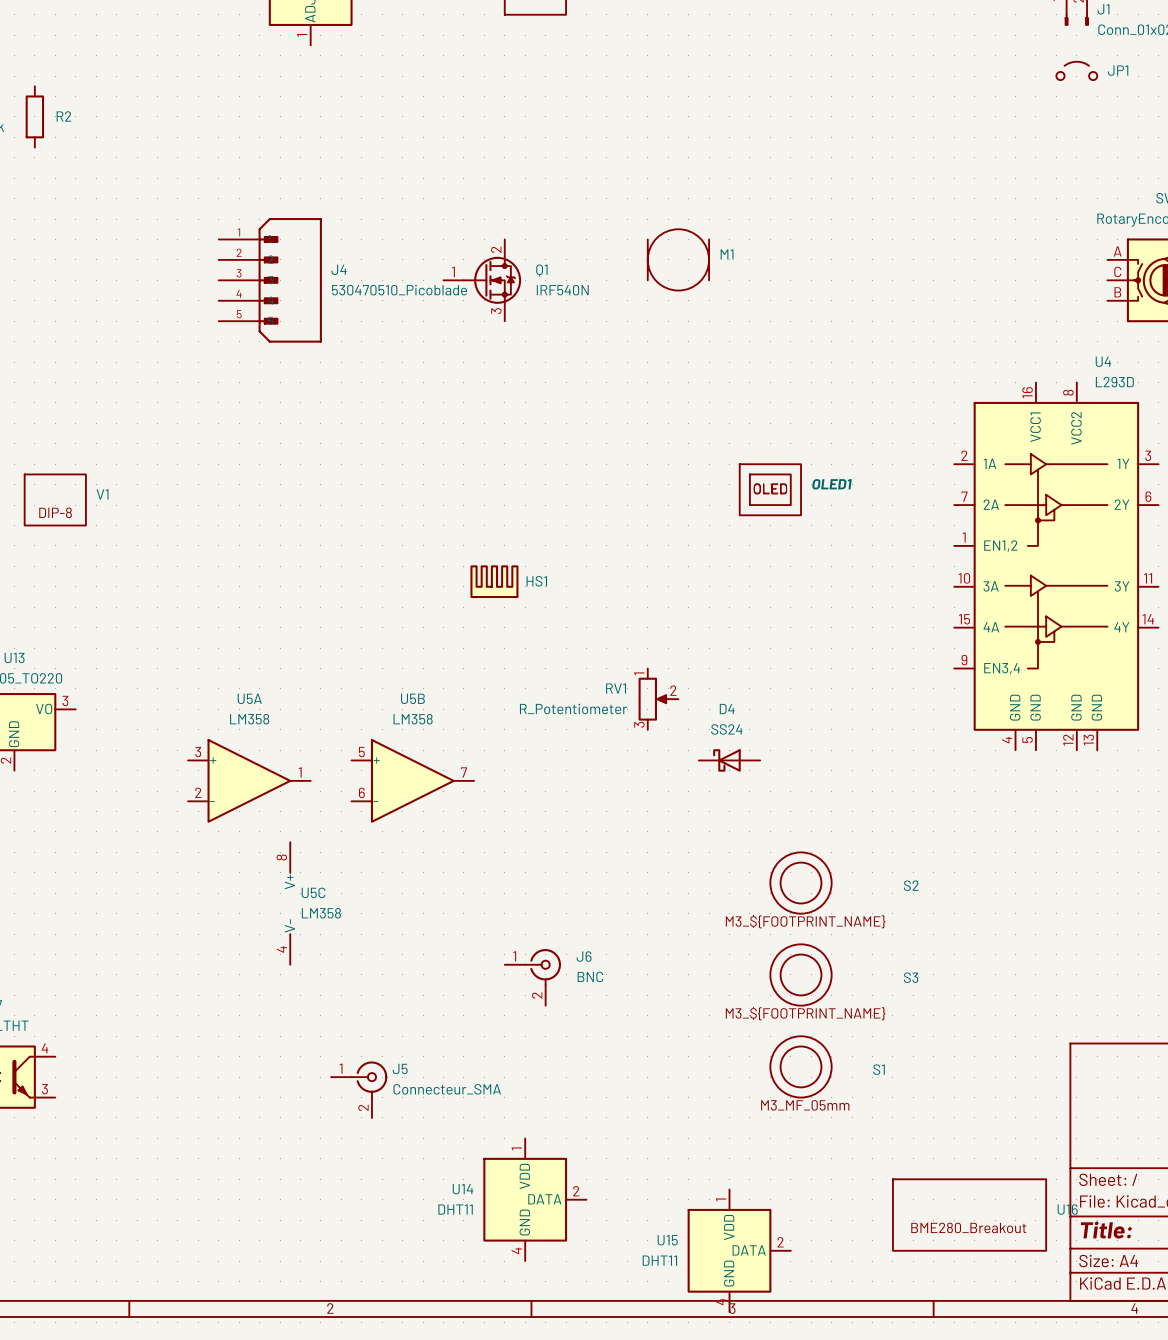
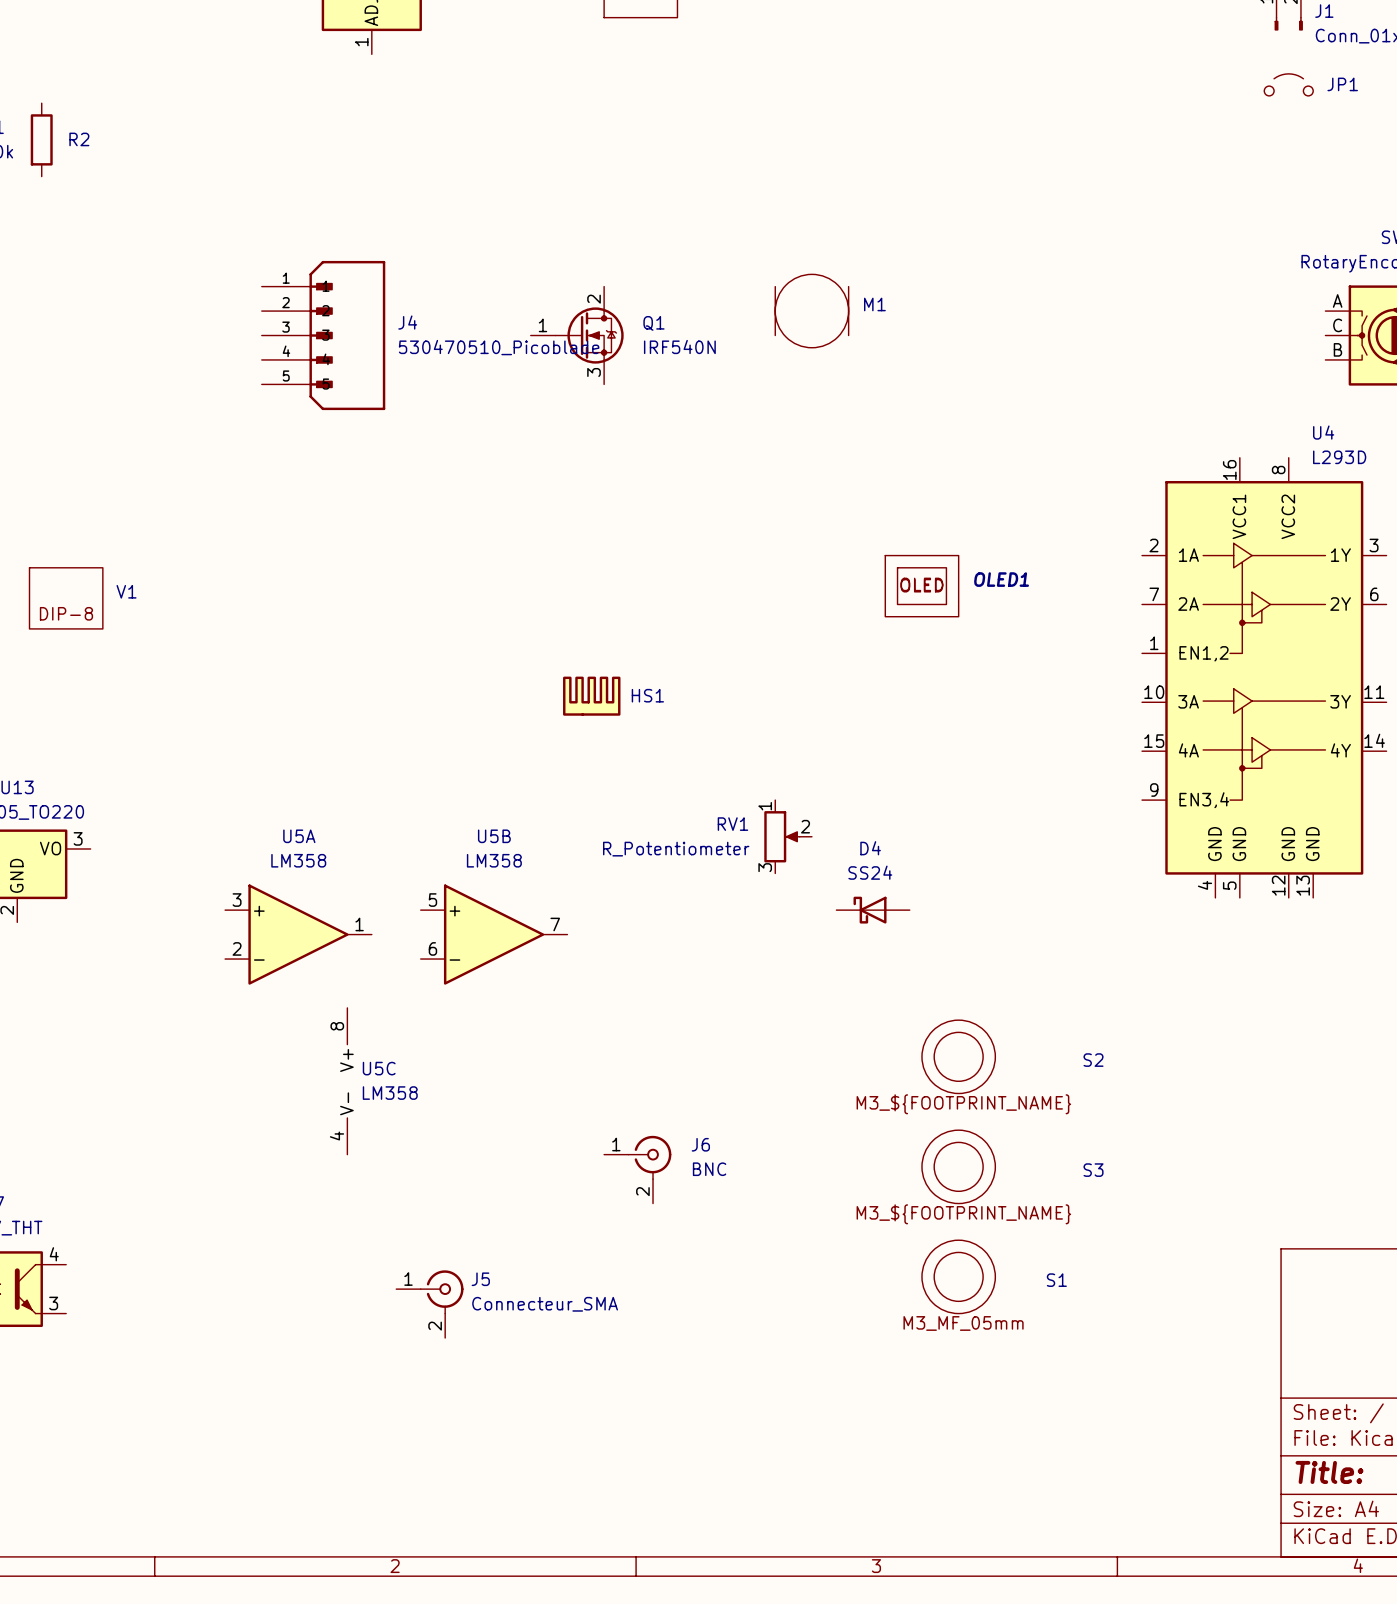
U14: DHT11 (534, 1199) -> none
U16: (969, 1215) -> none
U15: DHT11 (739, 1250) -> none

